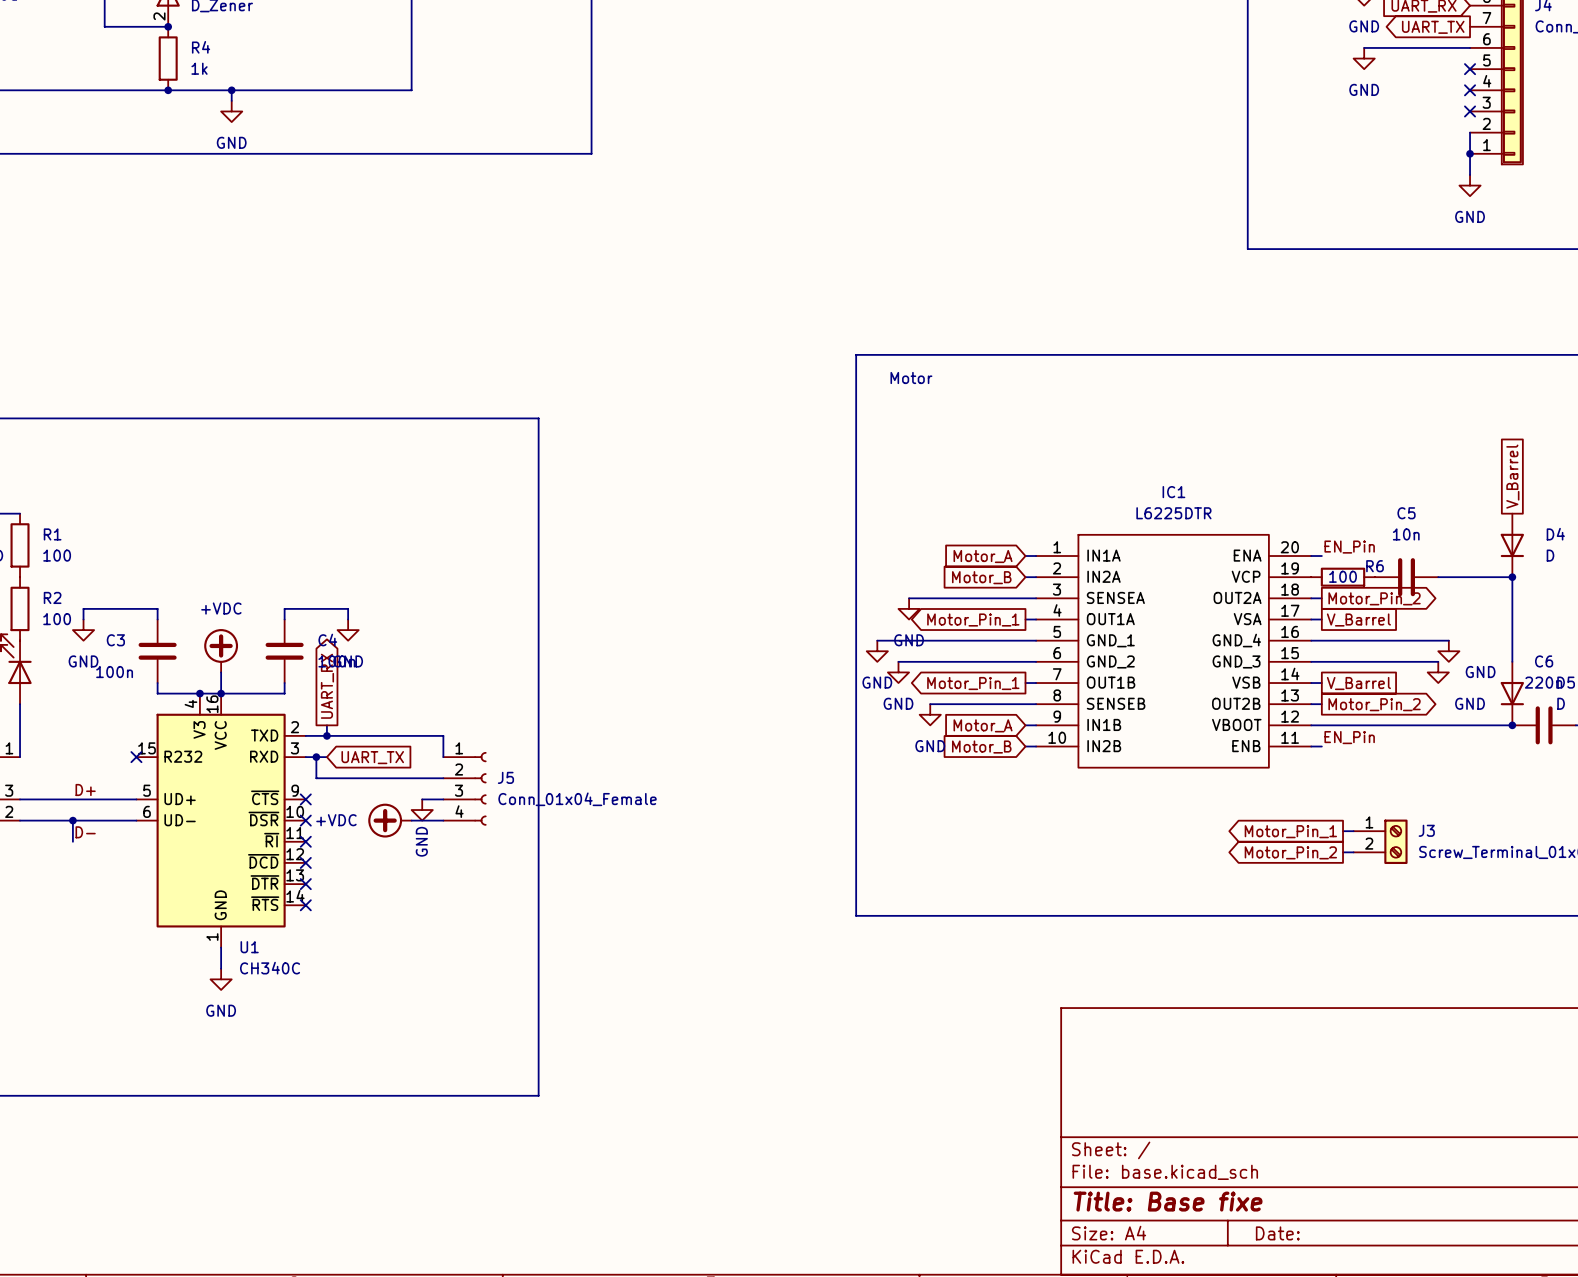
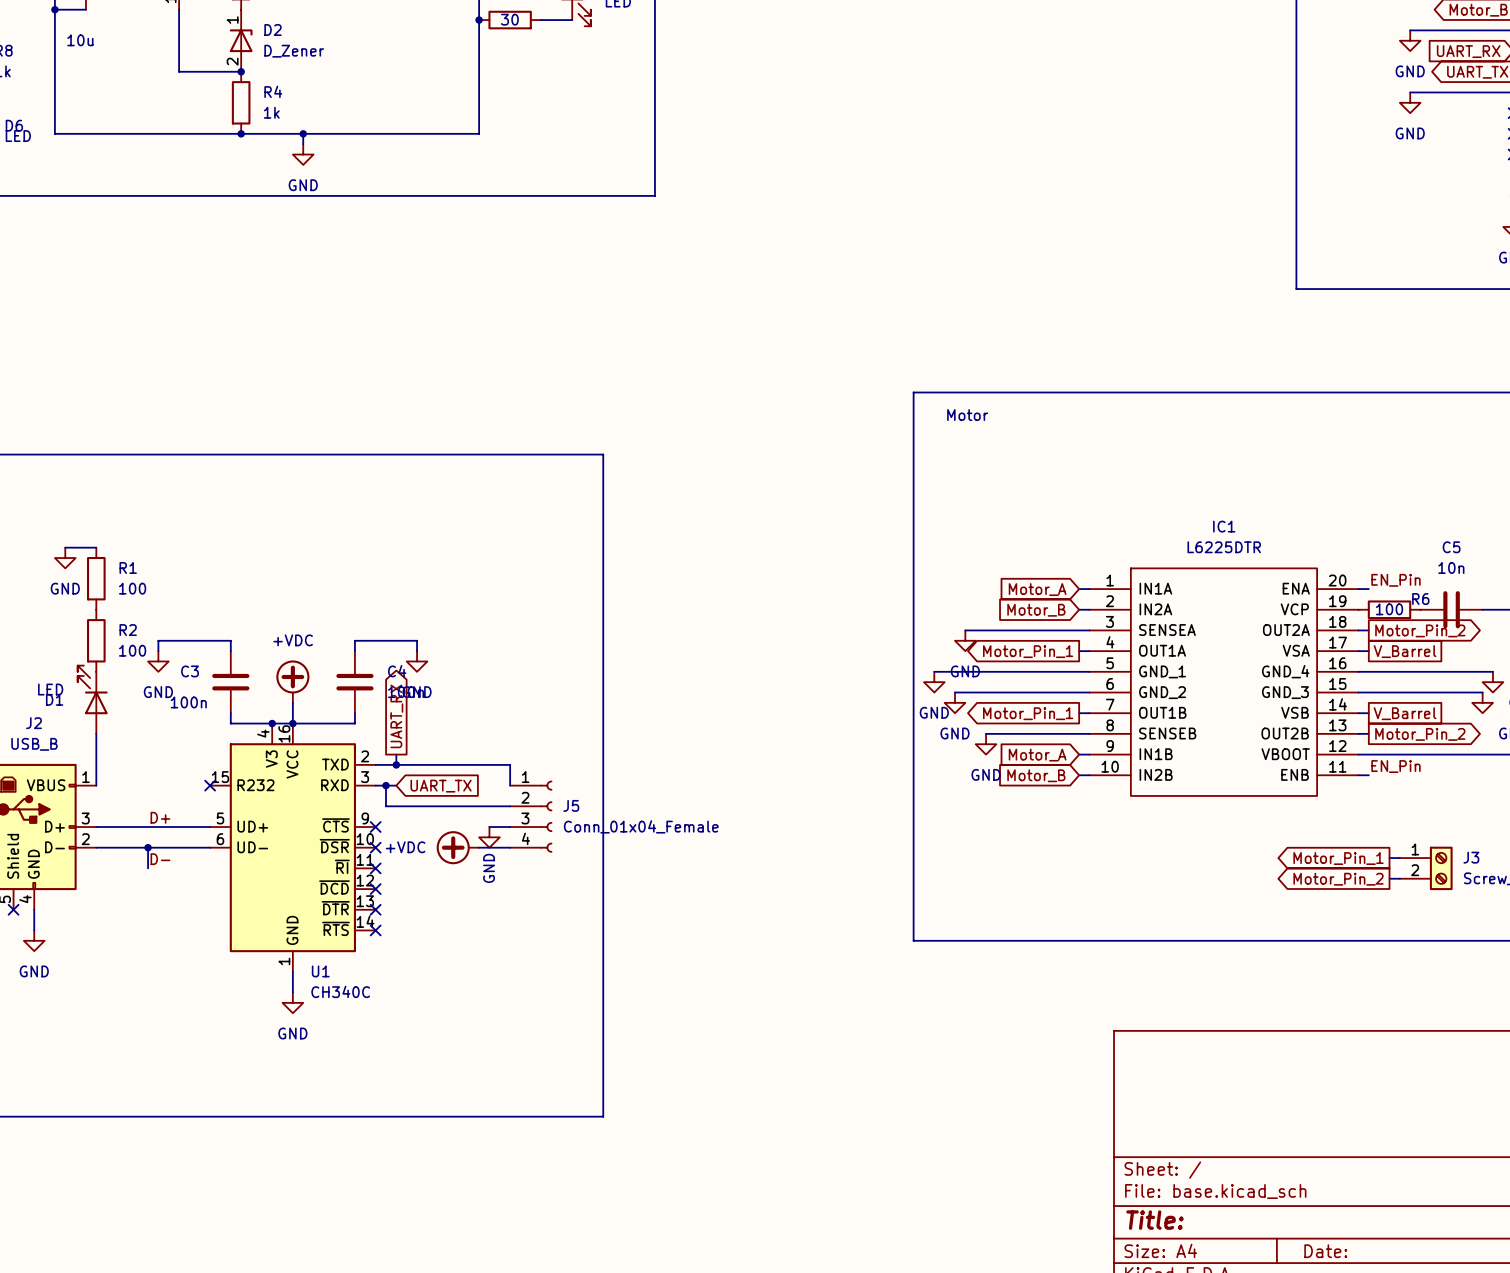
title block: Title: Base fixe (1168, 1201) -> Title: (1154, 1220)

